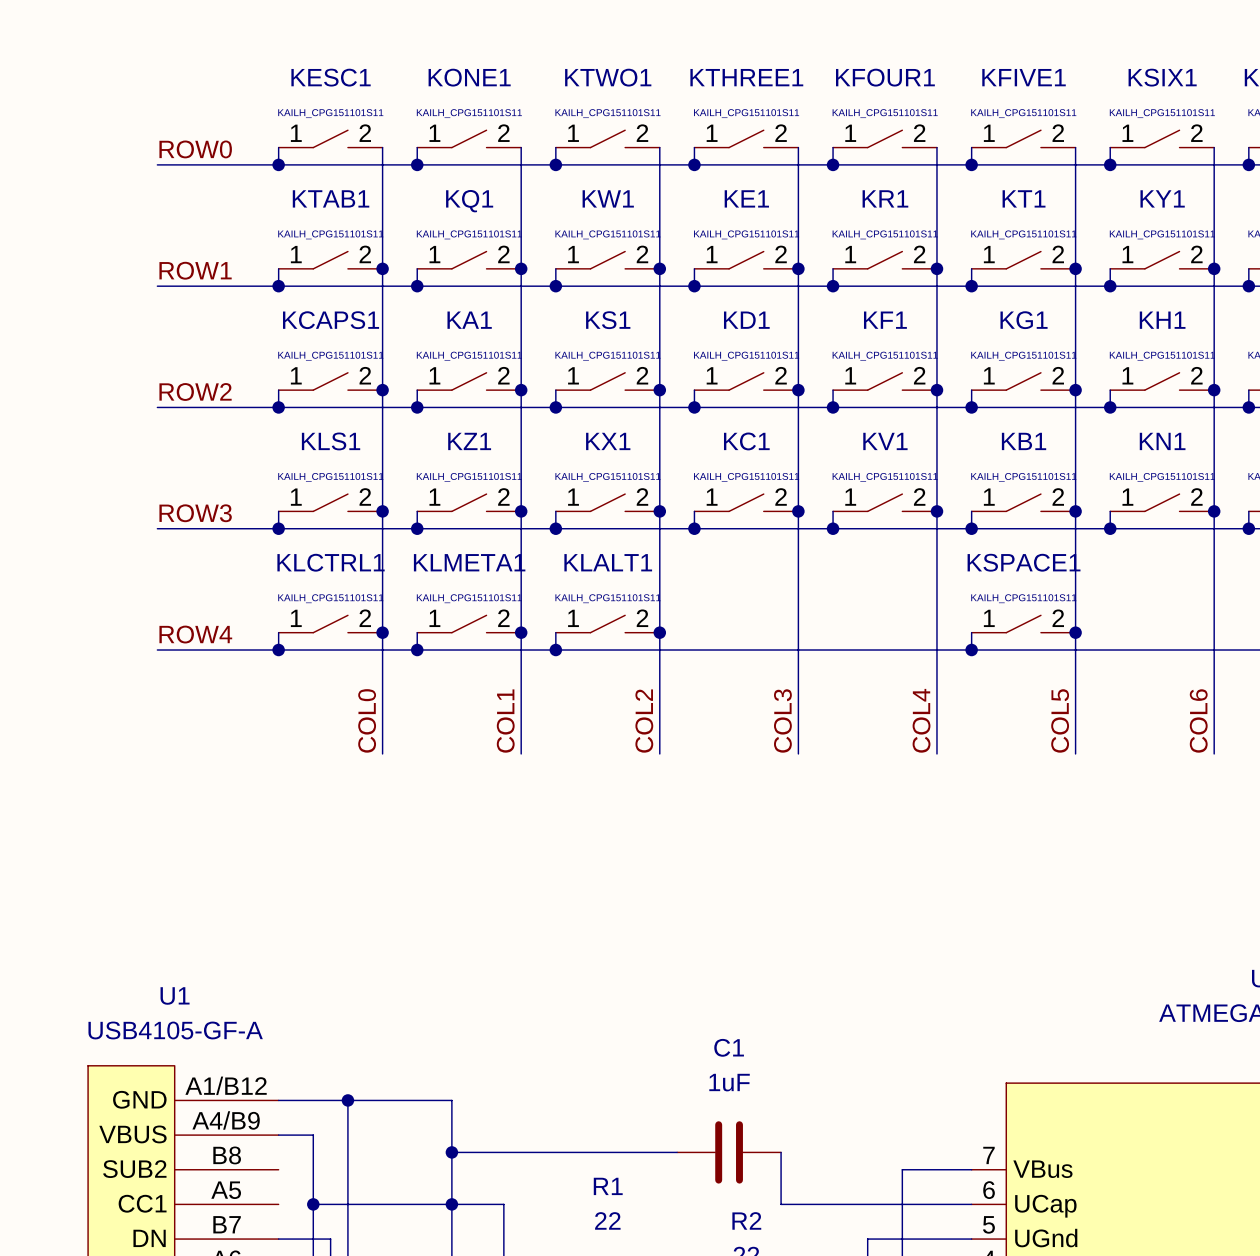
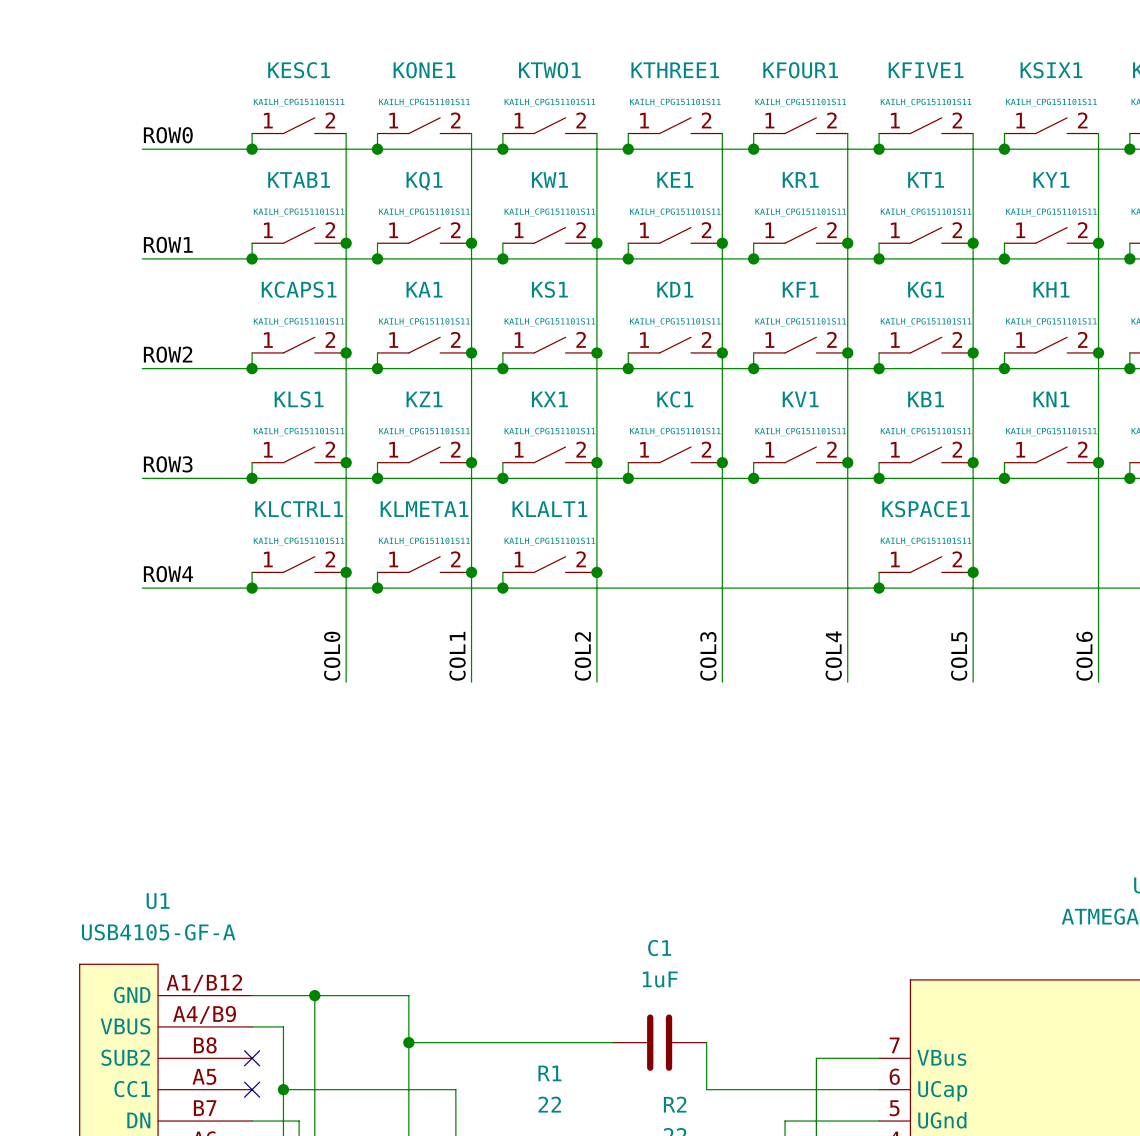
no-connect mark: none -> (252, 1058)
no-connect mark: none -> (252, 1089)
junction: (451, 1204) -> none

